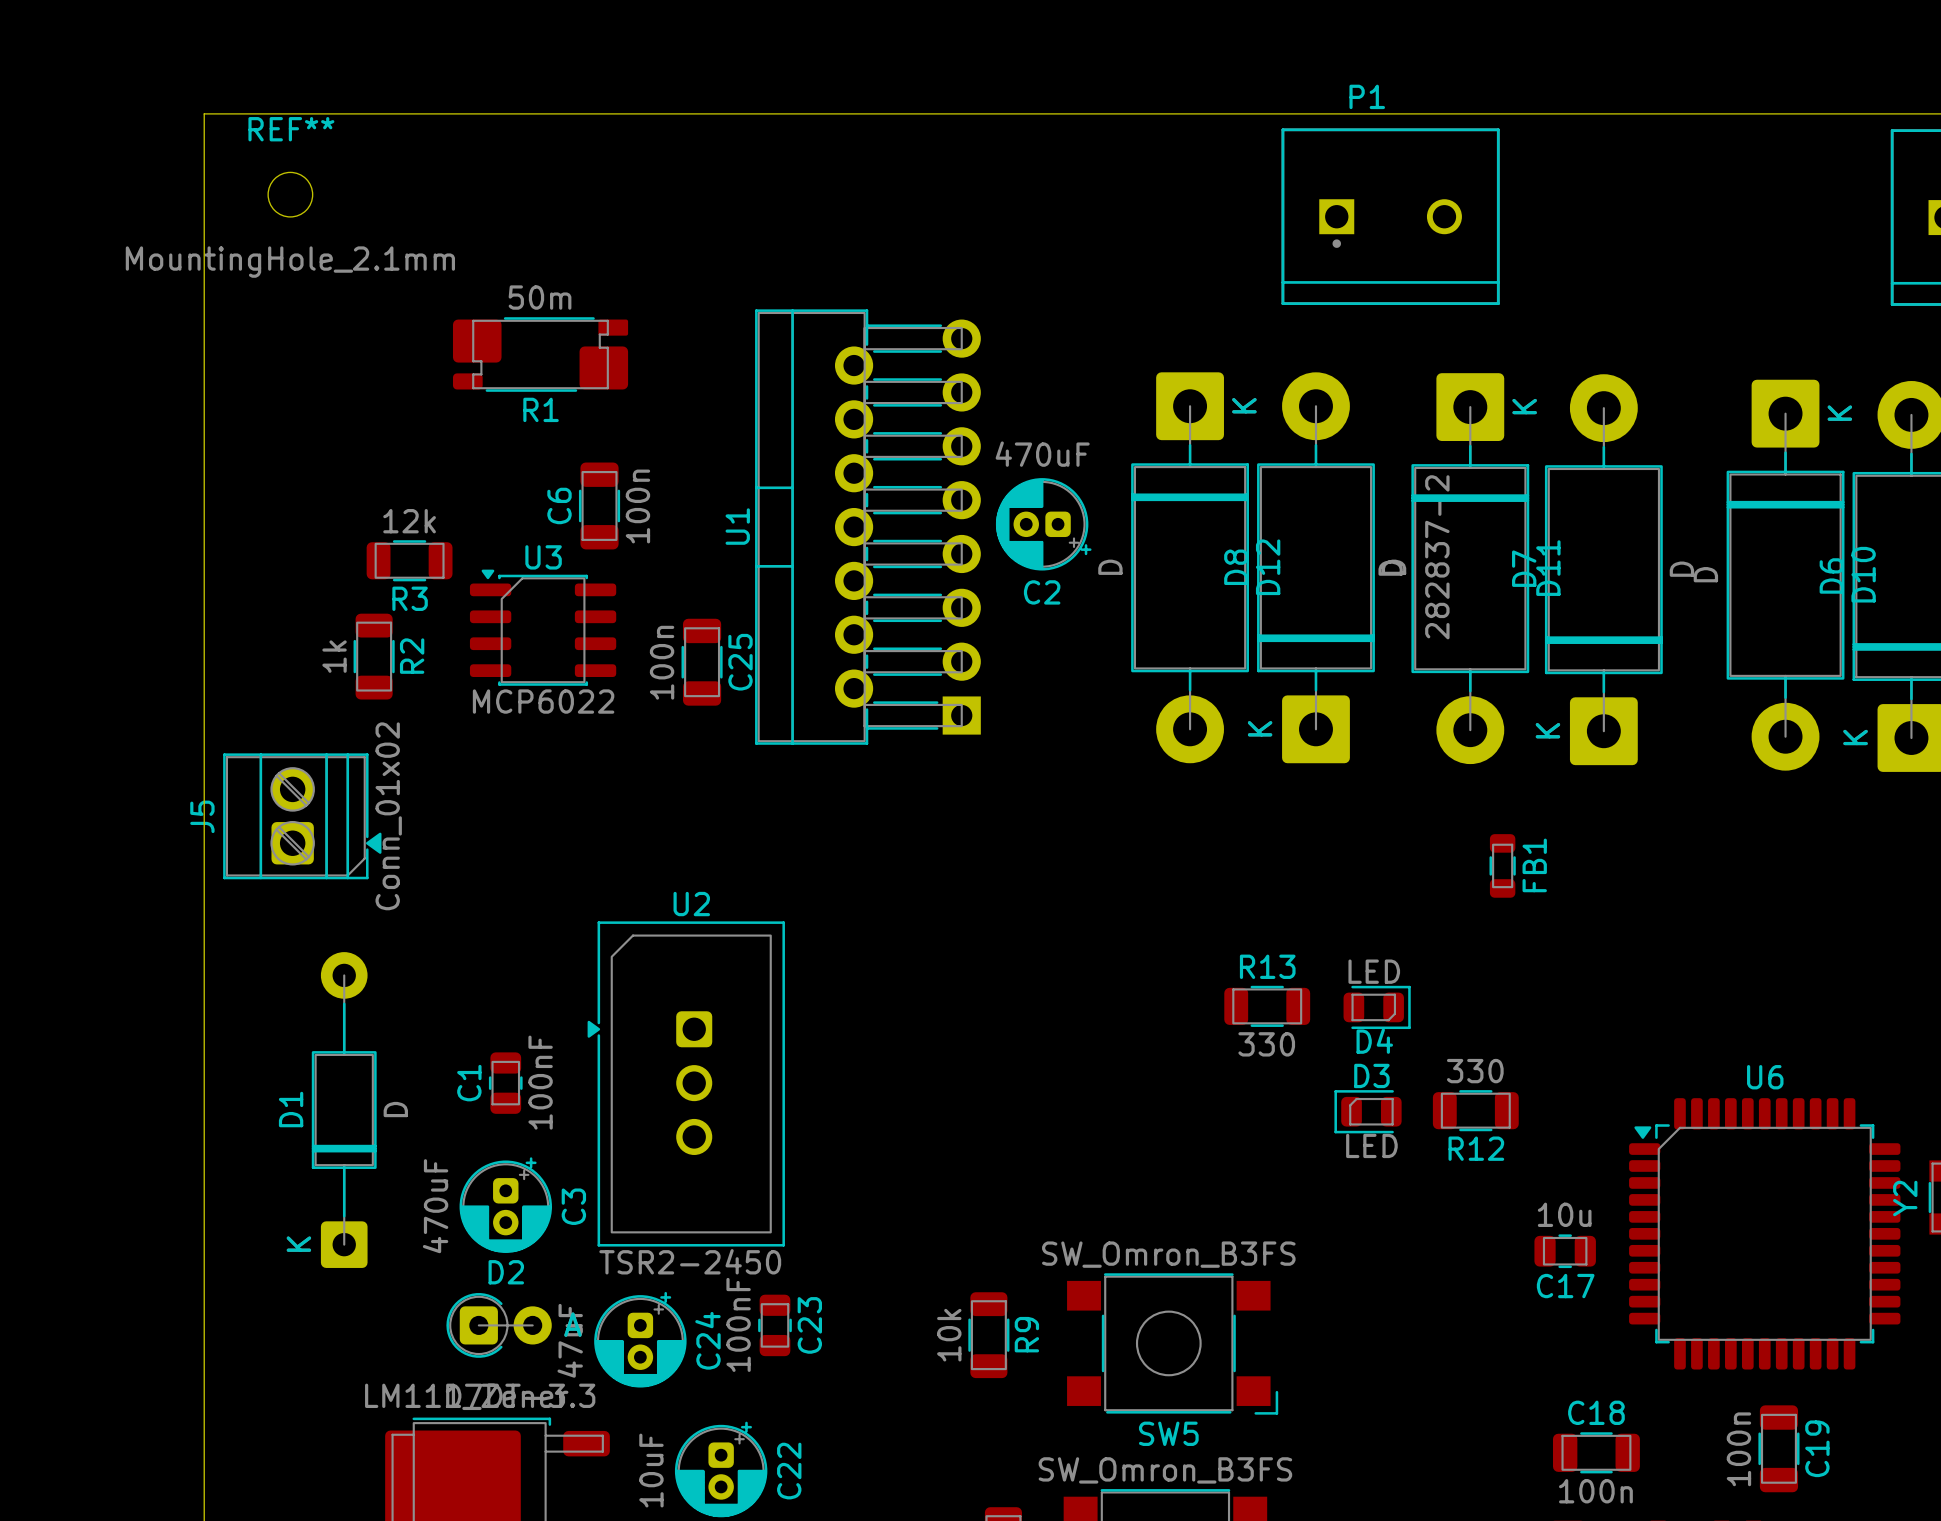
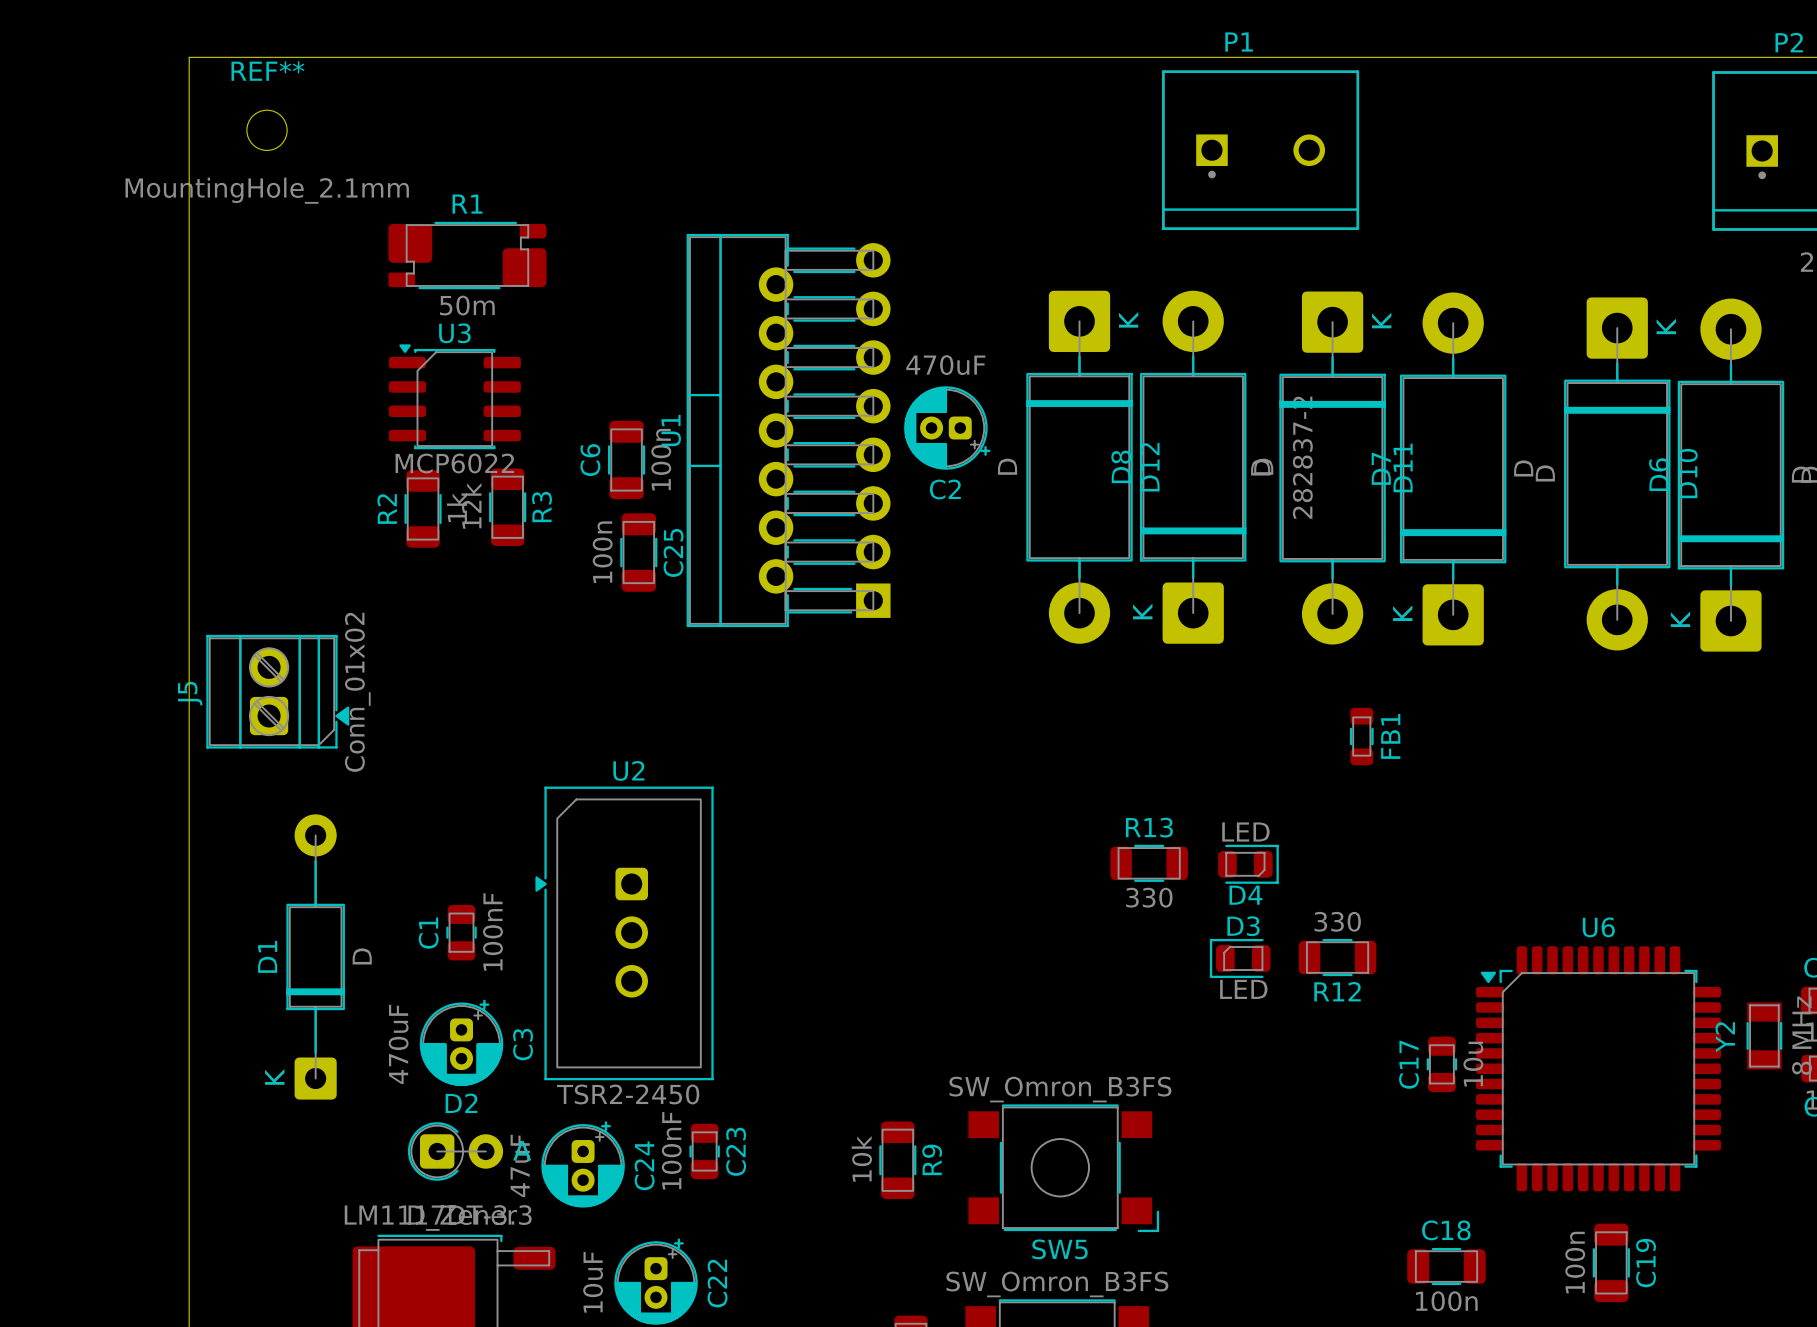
R1 rotation: 0° (540, 354) -> 180° (467, 255)
C6 position: (599, 505) -> (626, 459)
R3 value position: 12k (409, 521) -> 12k (471, 505)
R3 rotation: 0° (409, 560) -> 90° clockwise (507, 507)
R3 position: (409, 560) -> (507, 507)
R3 name position: R3 (410, 598) -> R3 (541, 507)
U3 position: (543, 627) -> (454, 396)
R2 value position: 1k (334, 656) -> 1k (456, 507)
R2 position: (374, 656) -> (423, 508)
R2 name position: R2 (412, 656) -> R2 (387, 509)
C17 rotation: 0° (1565, 1251) -> 90° clockwise (1441, 1064)

